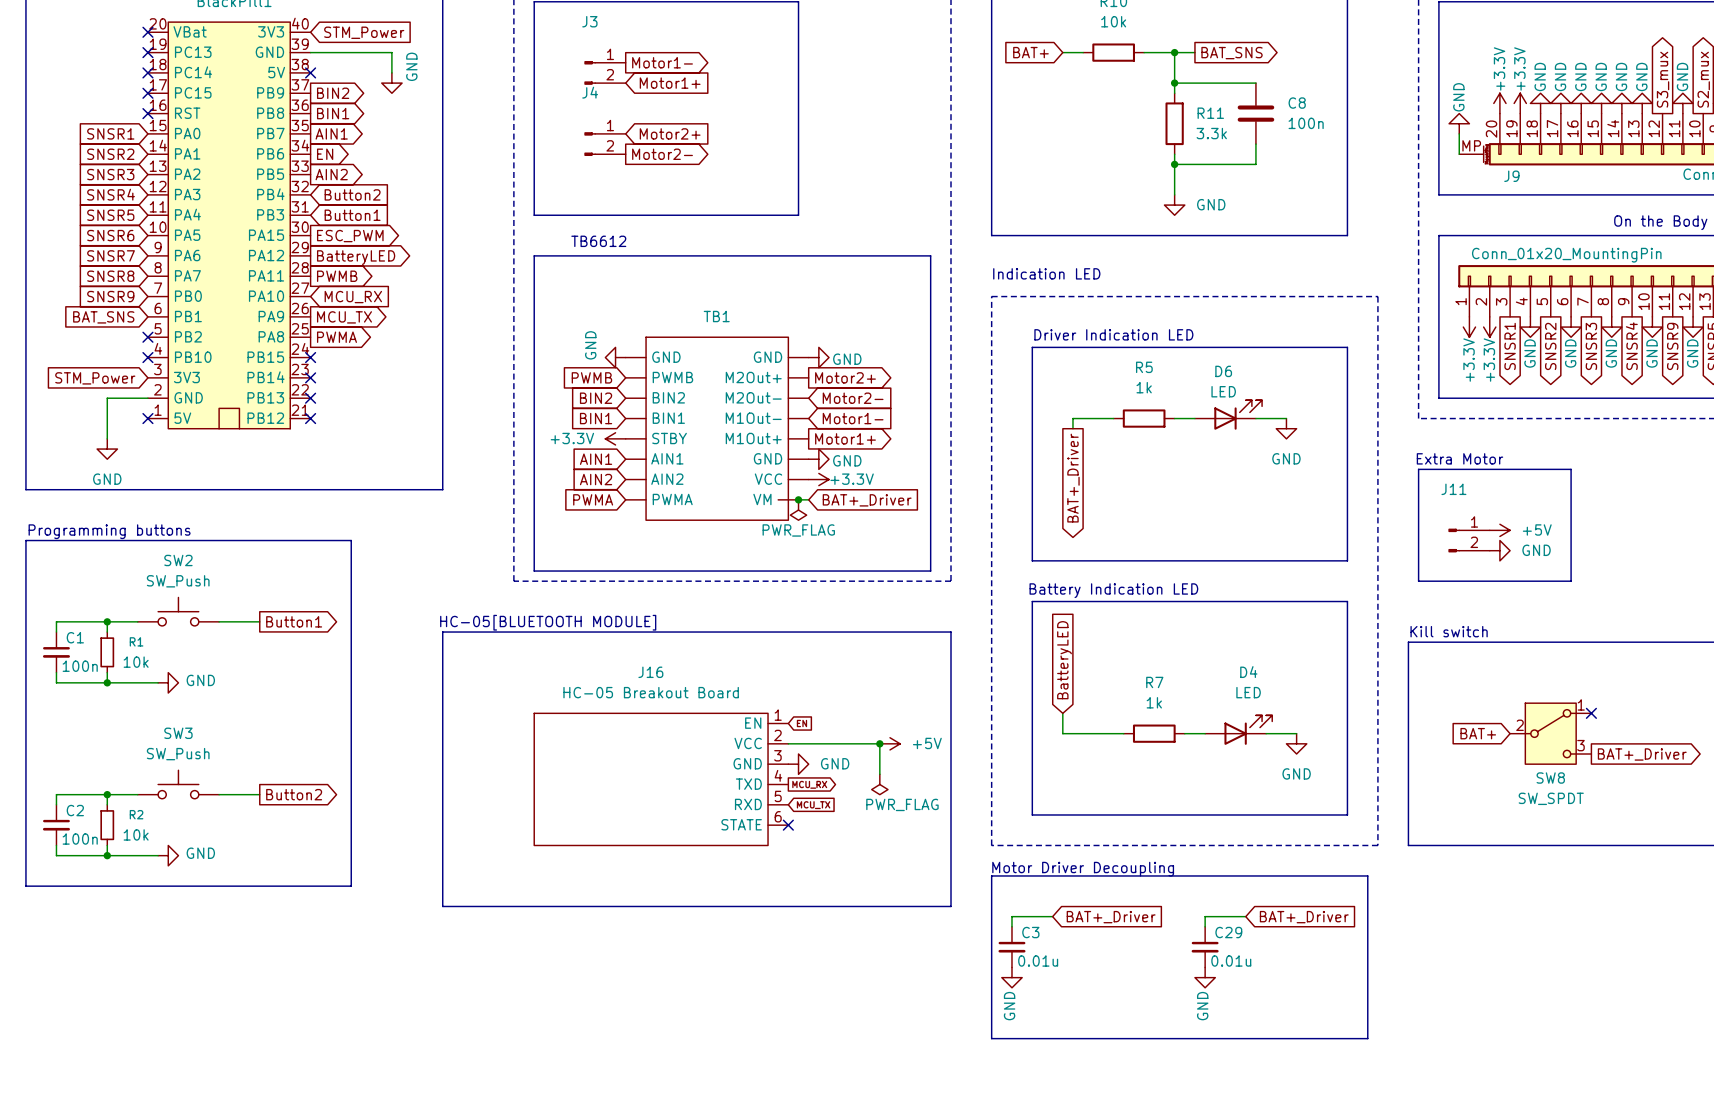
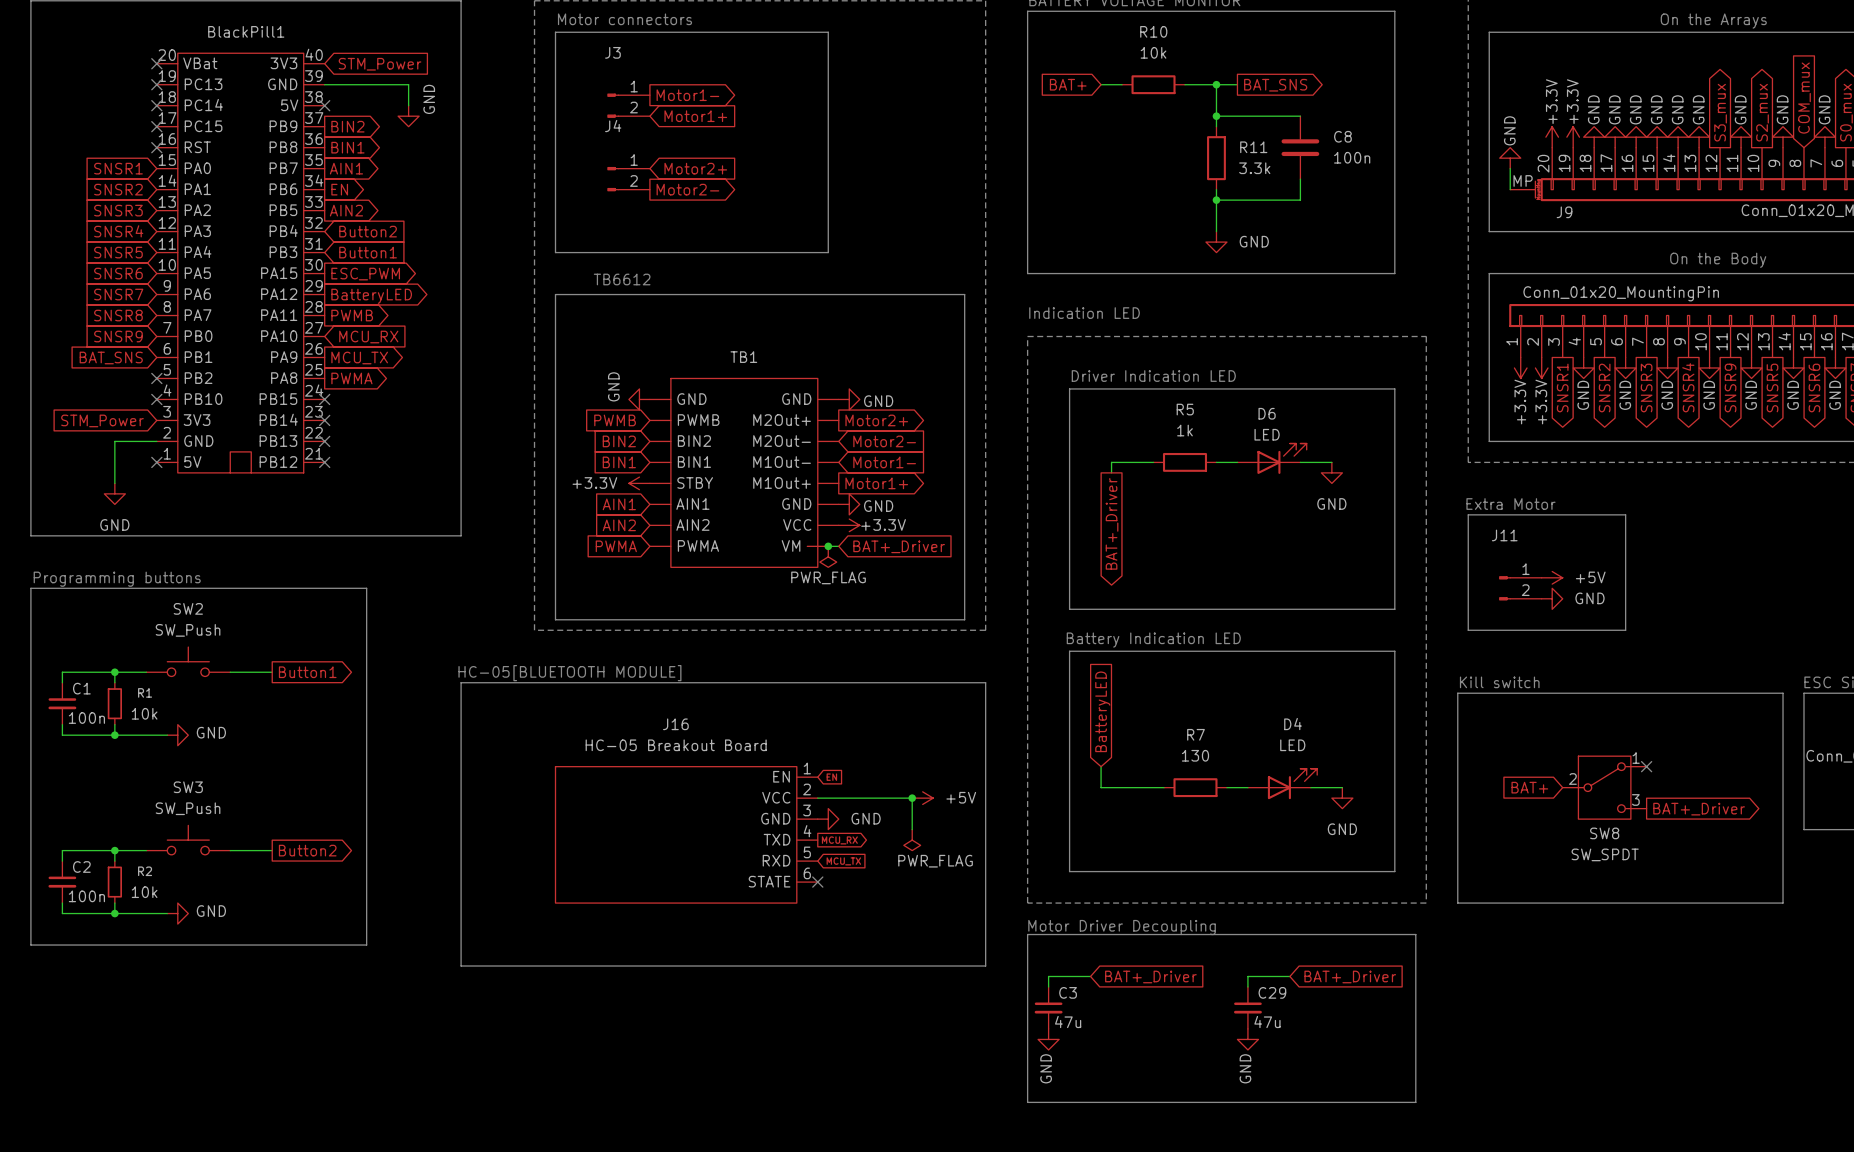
R7 value: 1k (1154, 702) -> 130 (1195, 755)
C3 value: 0.01u (1038, 960) -> 47u (1068, 1022)
C29 value: 0.01u (1231, 960) -> 47u (1267, 1022)

